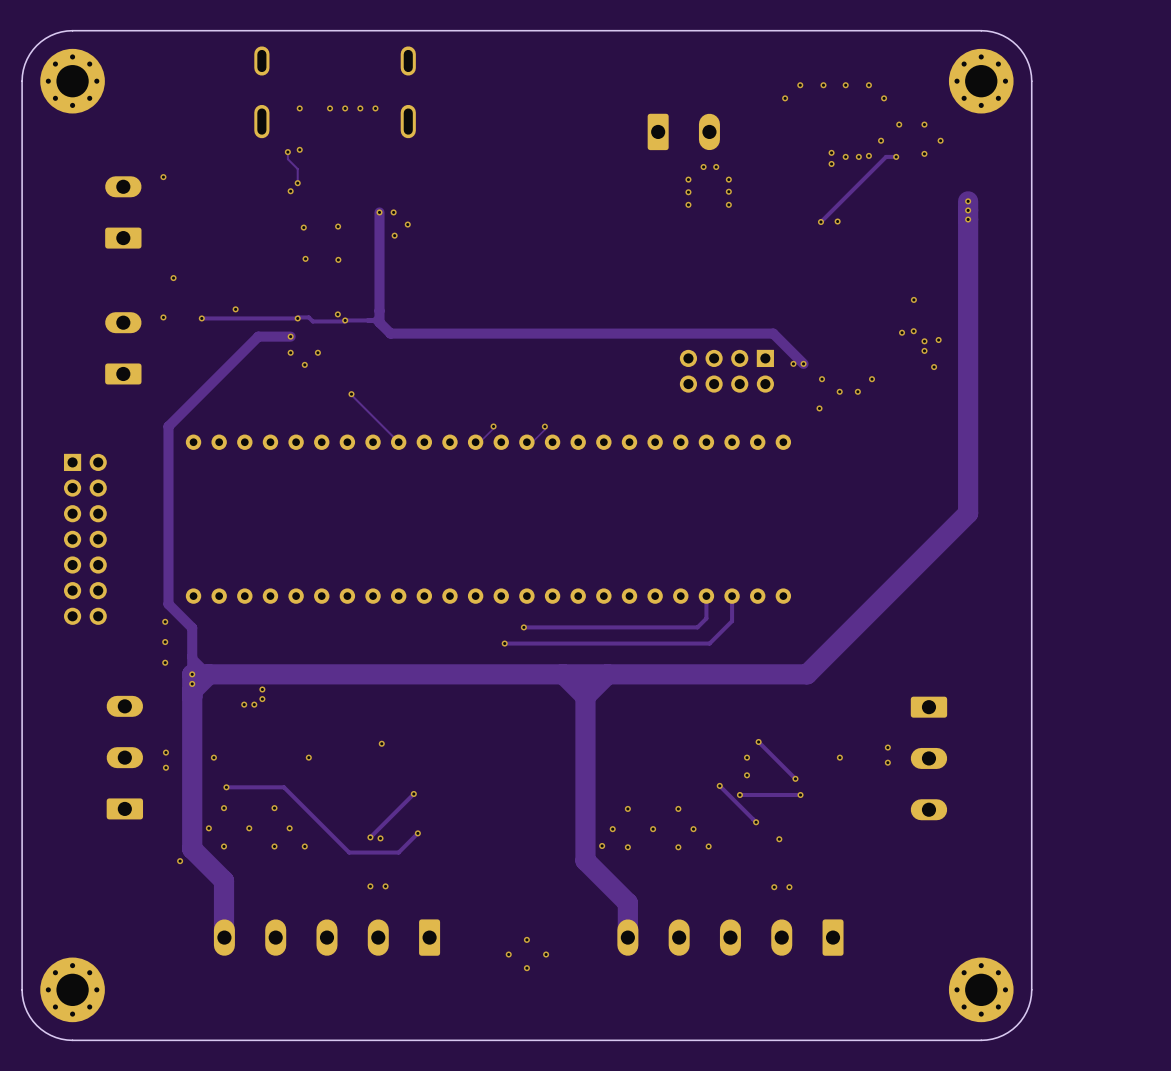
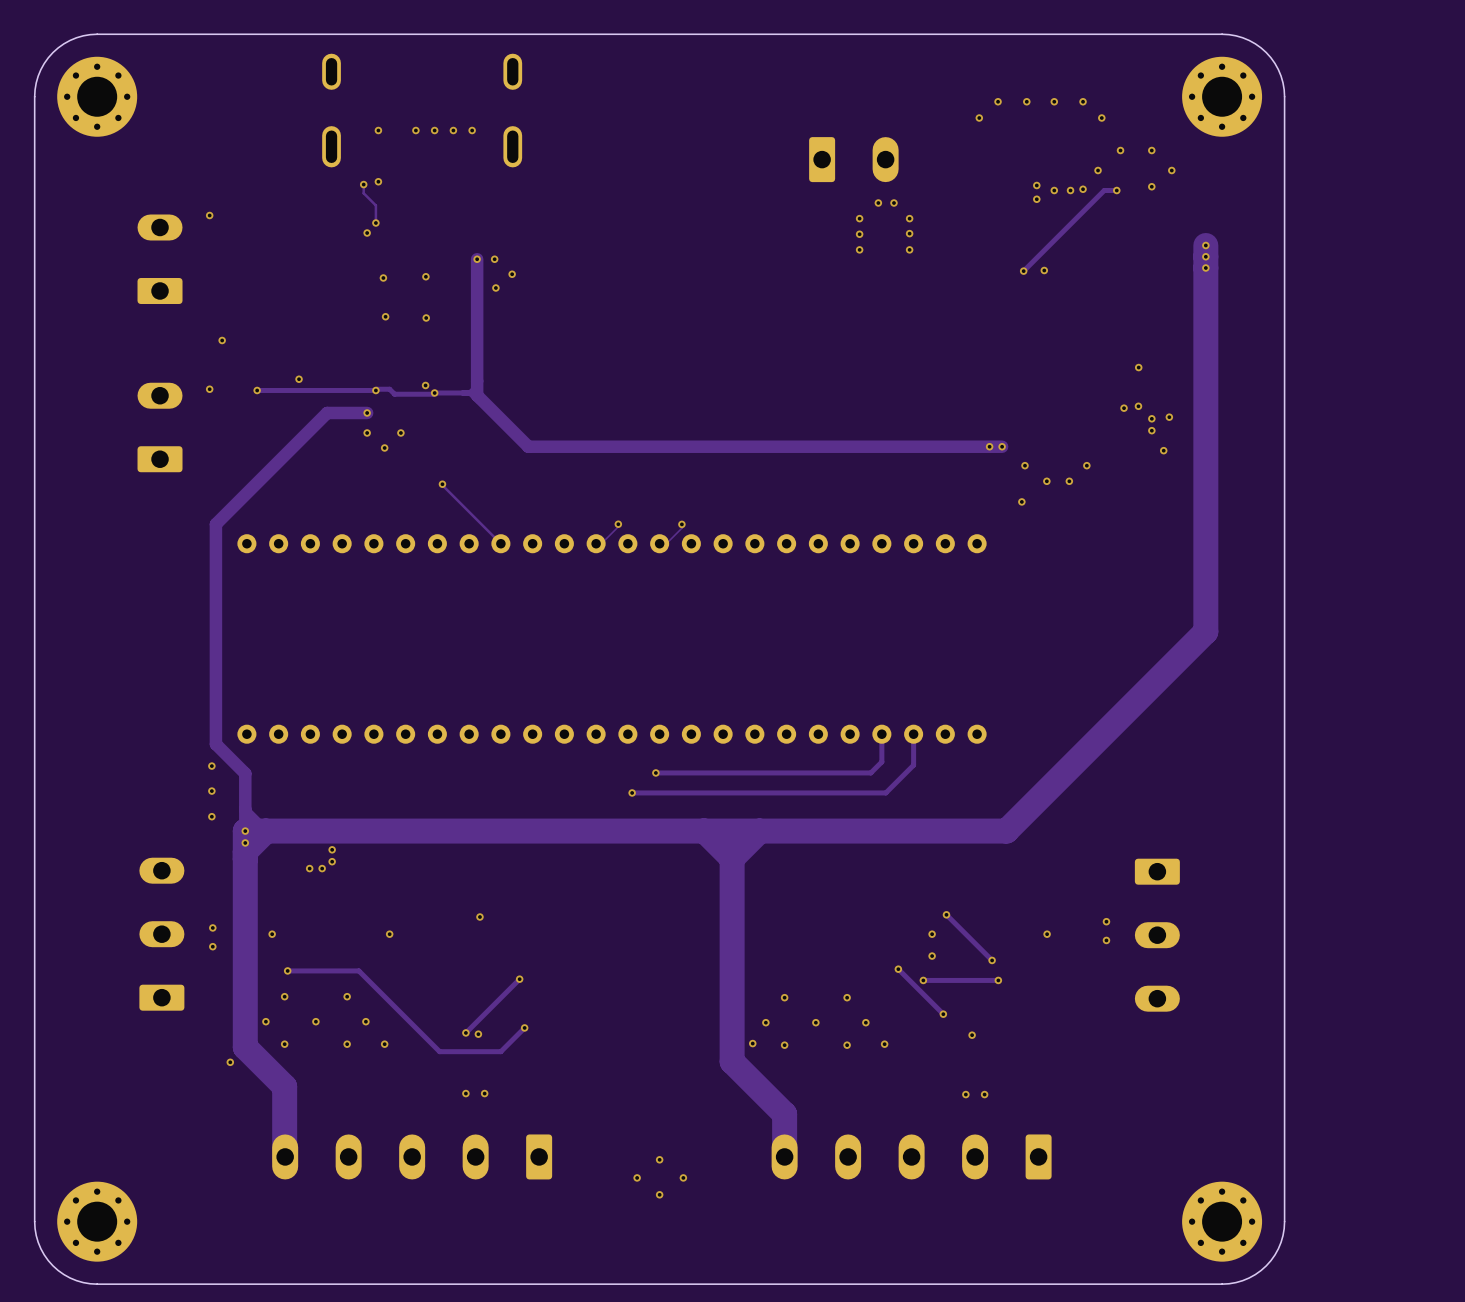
track: (390, 333) (773, 333) (803, 363) -> (490, 409) (528, 446) (1002, 446)
part: (726, 371) -> none
part: (85, 539) -> none

